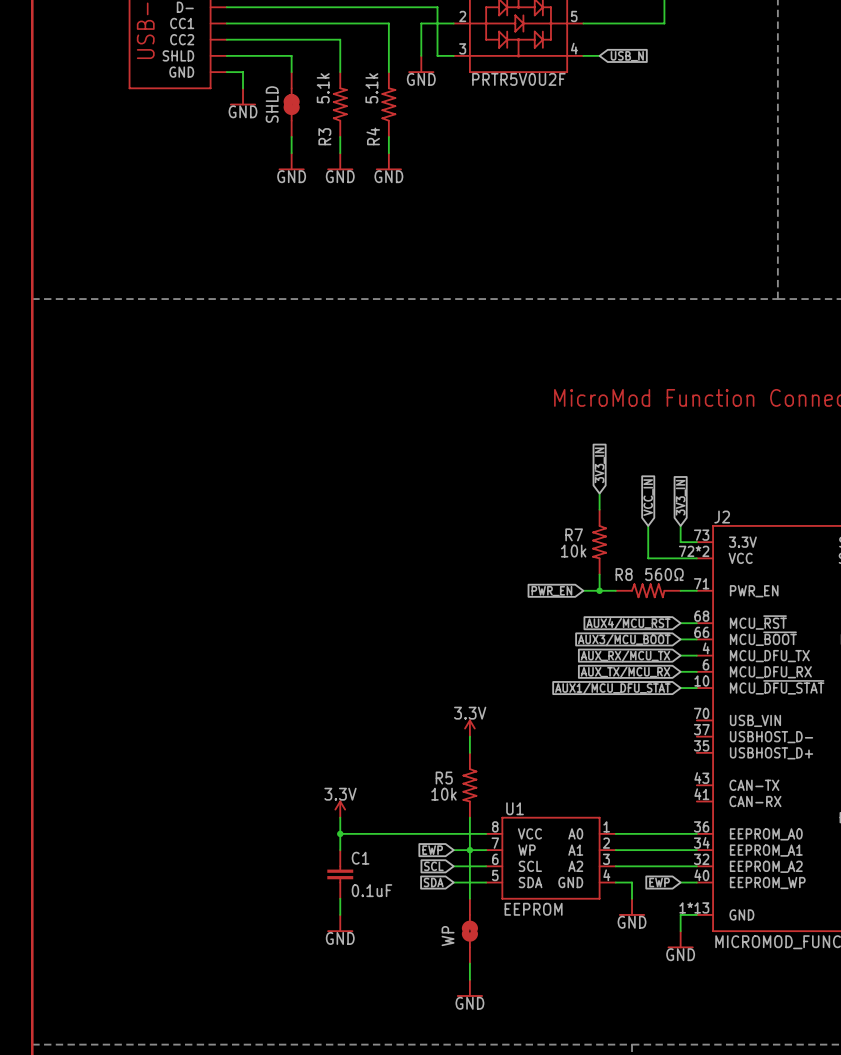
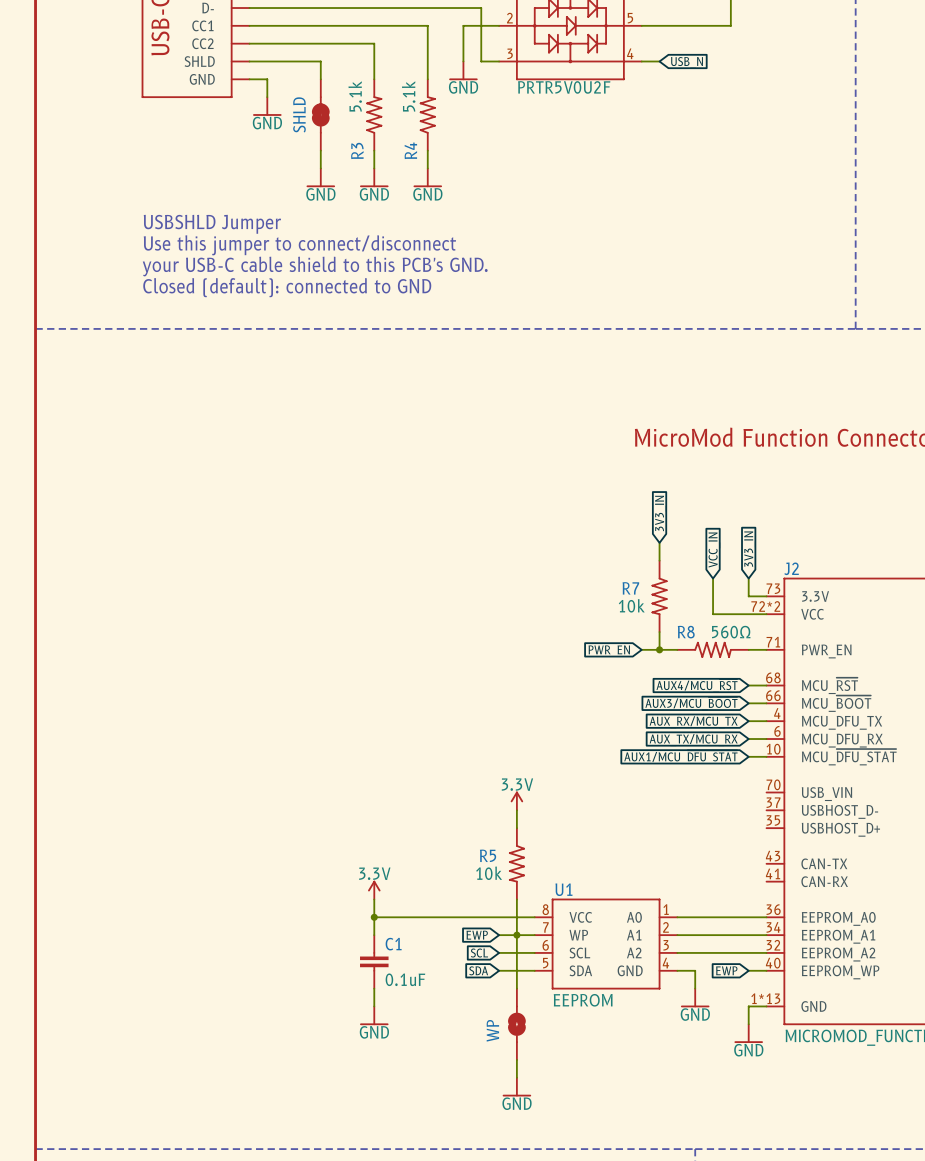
text: none -> USBSHLD Jumper (212, 224)
text: none -> Use this jumper to connect/disconnect (299, 245)
text: none -> your USB-C cable shield to this PCB's GND. (315, 266)
text: none -> Closed (default): connected to GND (287, 287)

